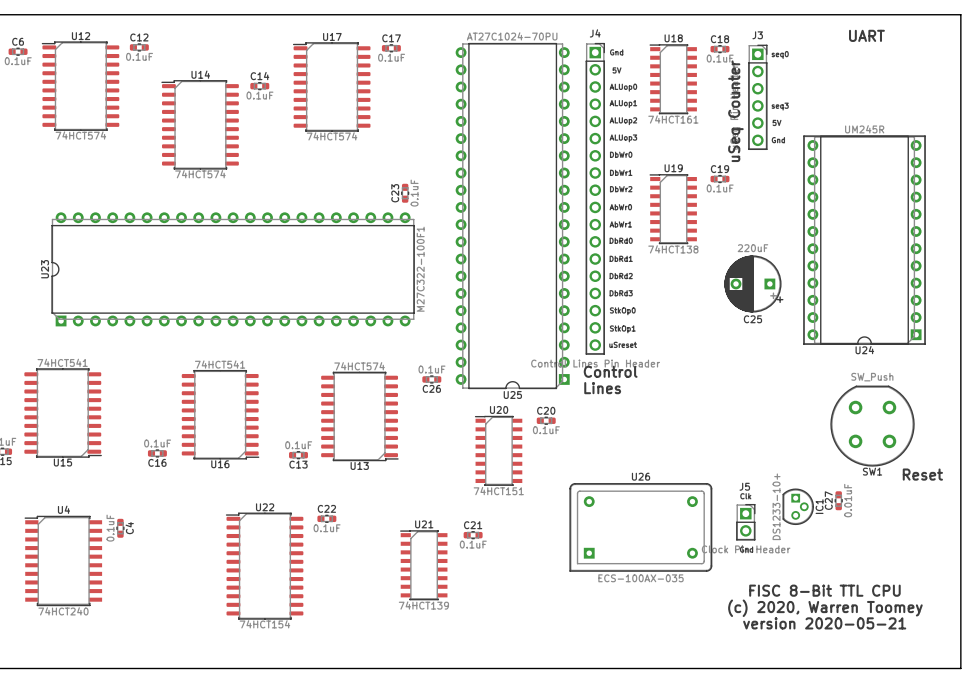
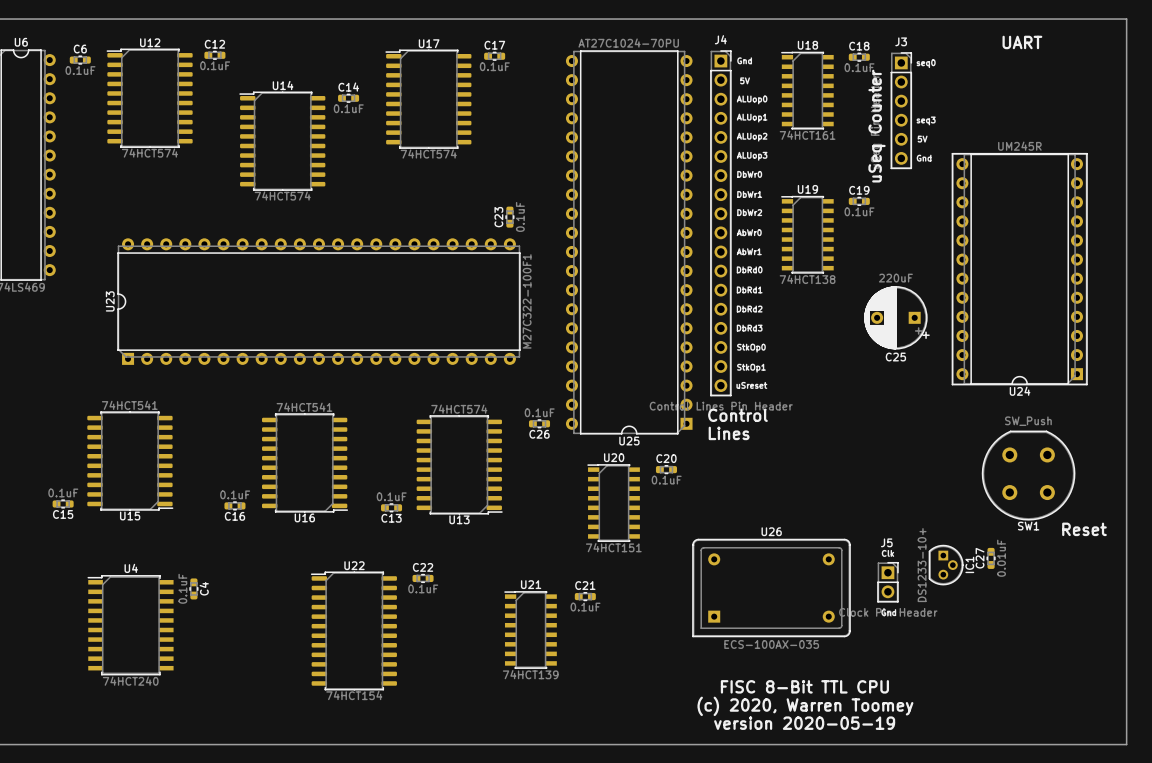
text position: FISC 8-Bit TTL CPU (824, 590) -> FISC 8-Bit TTL CPU (804, 686)
text position: (c) 2020, Warren Toomey (825, 608) -> (c) 2020, Warren Toomey (805, 706)
text: version 2020-05-21 (824, 623) -> none
text: none -> version 2020-05-19 (804, 723)

